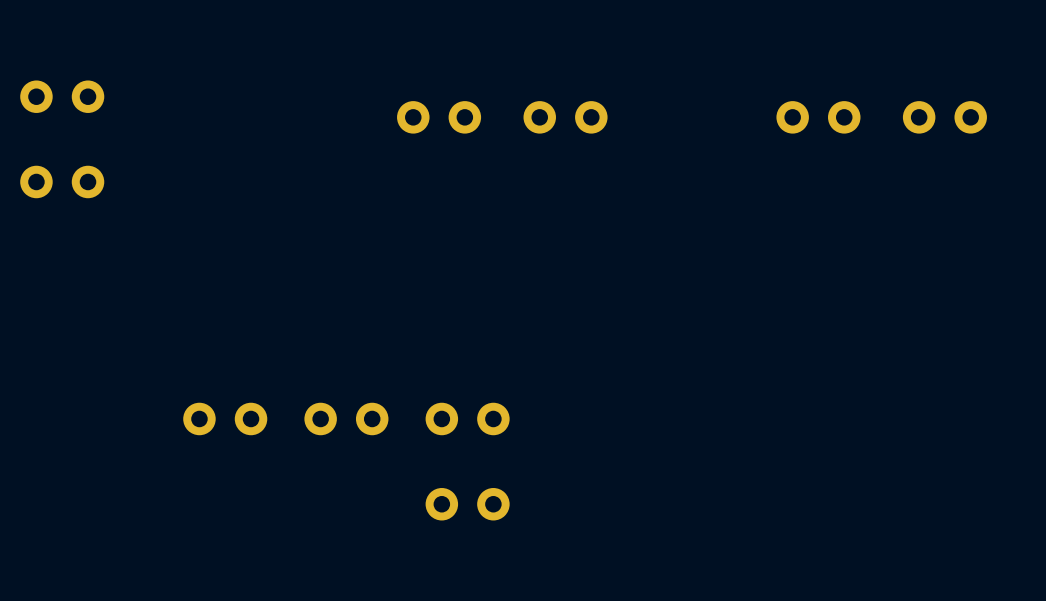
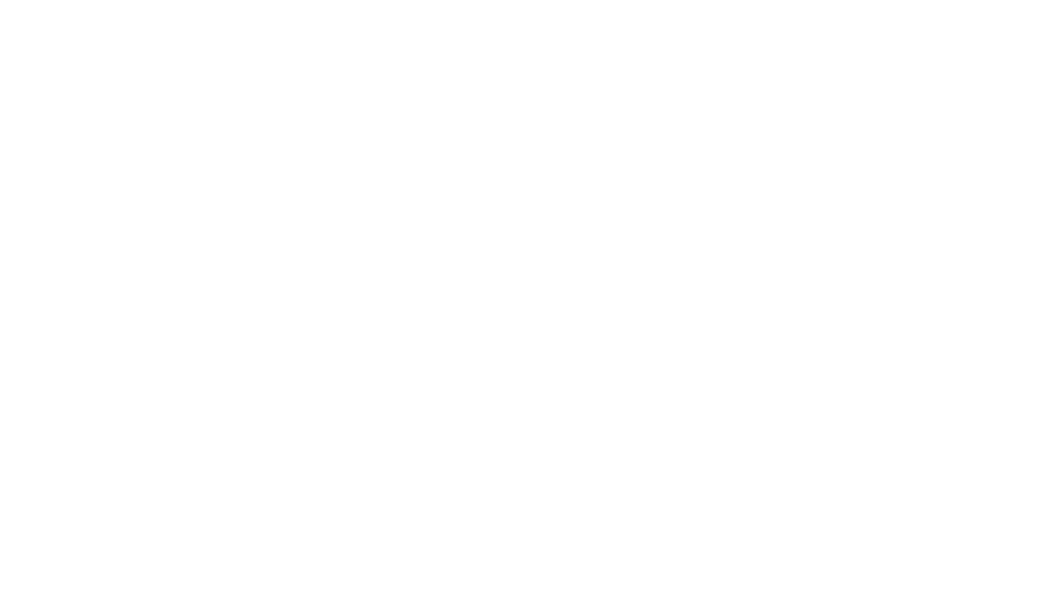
part: (62, 96) -> none
part: (439, 117) -> none
part: (565, 117) -> none
part: (818, 117) -> none
part: (944, 117) -> none
part: (62, 181) -> none
part: (225, 418) -> none
part: (346, 418) -> none
part: (467, 418) -> none
part: (467, 504) -> none

